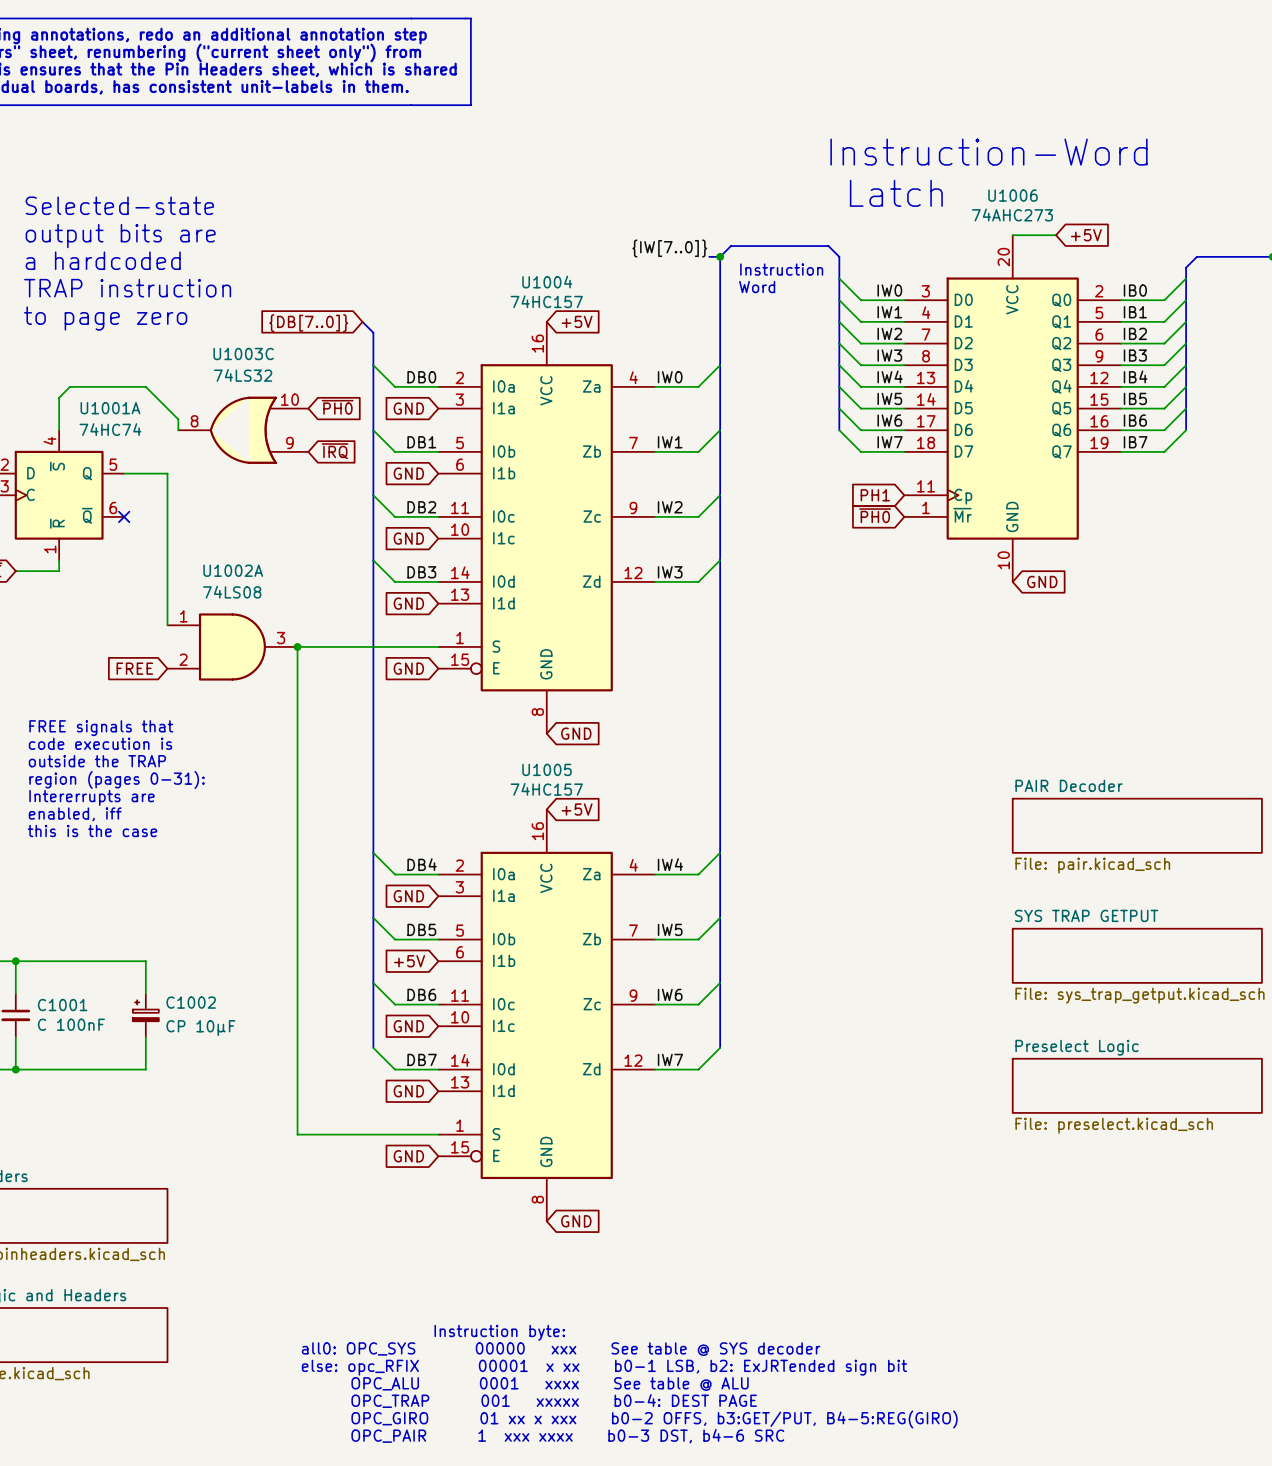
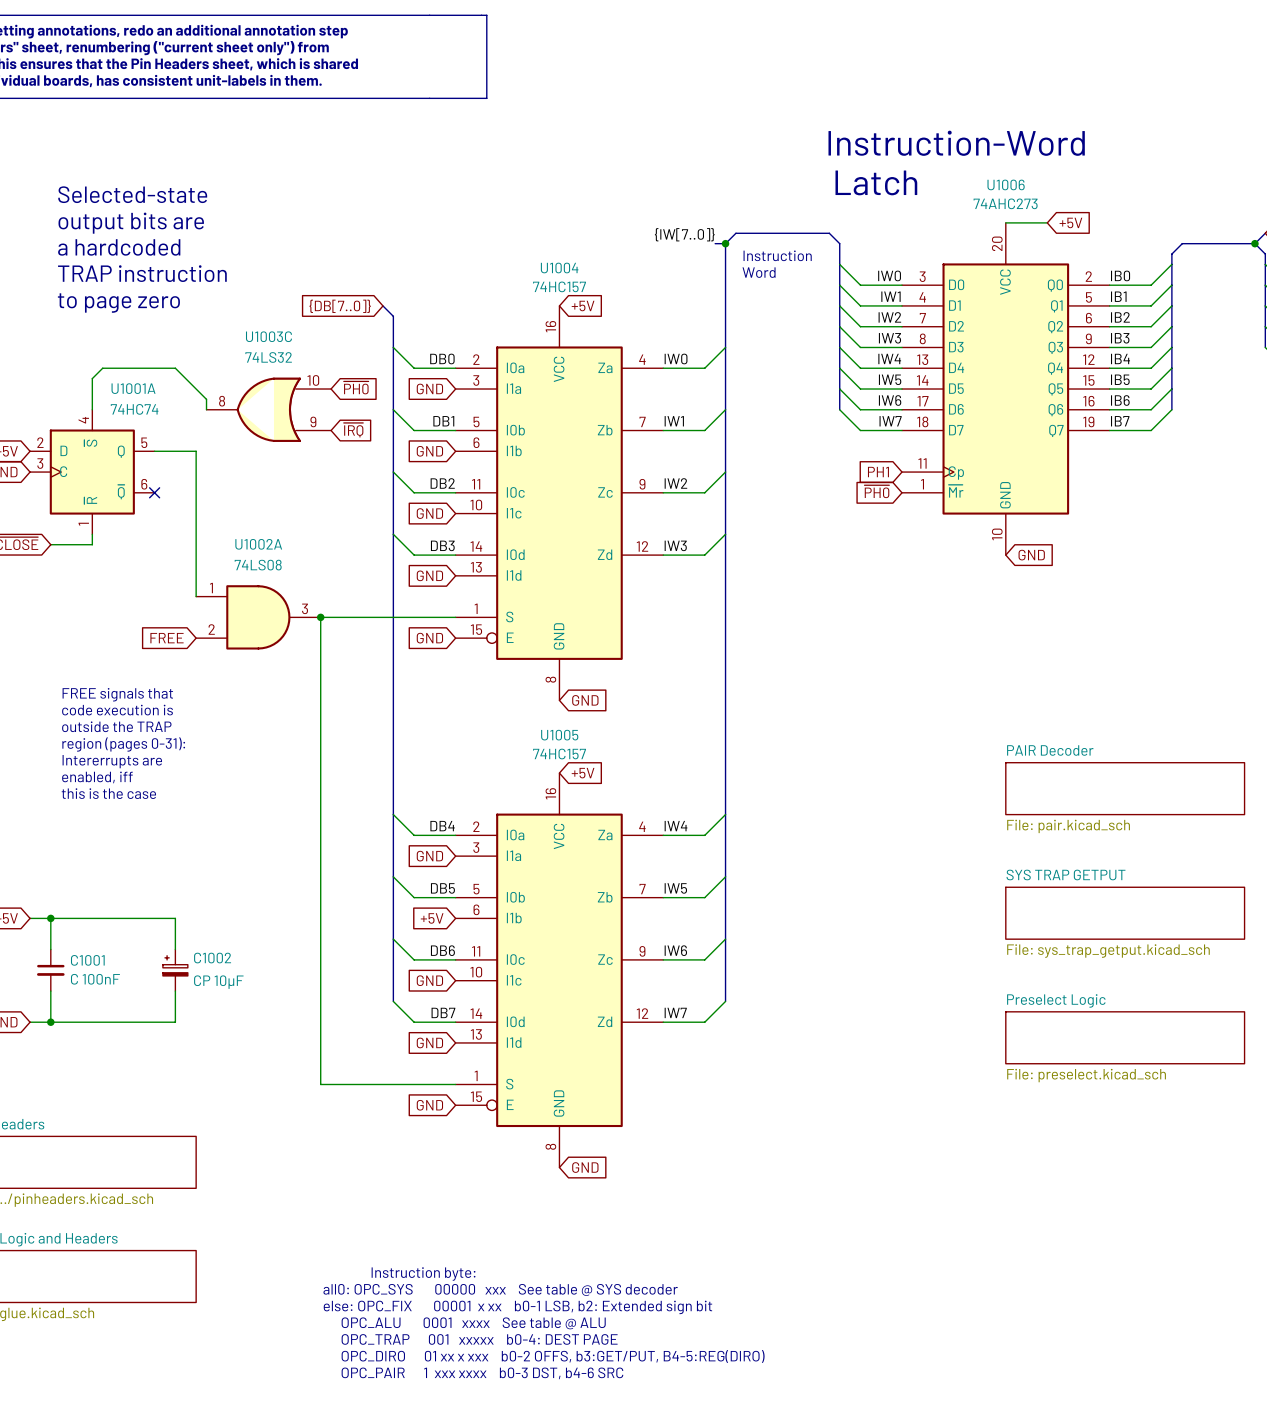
text: else: opc_RFIX 00001 x xx b0-1 LSB, b2: ExJRTended sign bit (604, 1367) -> else: OPC_FIX 00001 x xx b0-1 LSB, b2: Extended sign bit (517, 1307)
text: OPC_GIRO 01 xx x xxx b0-2 OFFS, b3:GET/PUT, B4-5:REG(GIRO) (654, 1419) -> OPC_DIRO 01 xx x xxx b0-2 OFFS, b3:GET/PUT, B4-5:REG(DIRO) (553, 1356)

